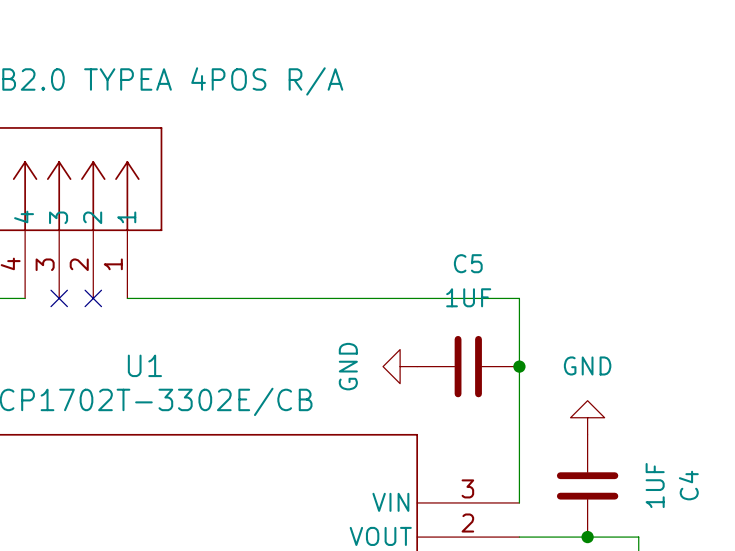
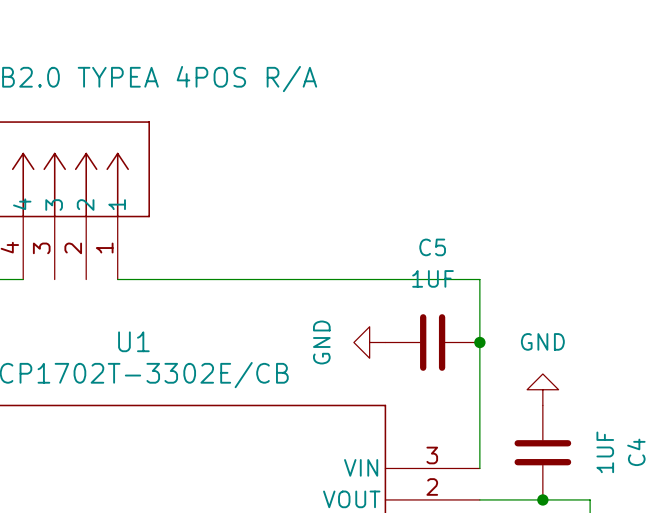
no-connect mark: (59, 298) -> none
no-connect mark: (93, 298) -> none

